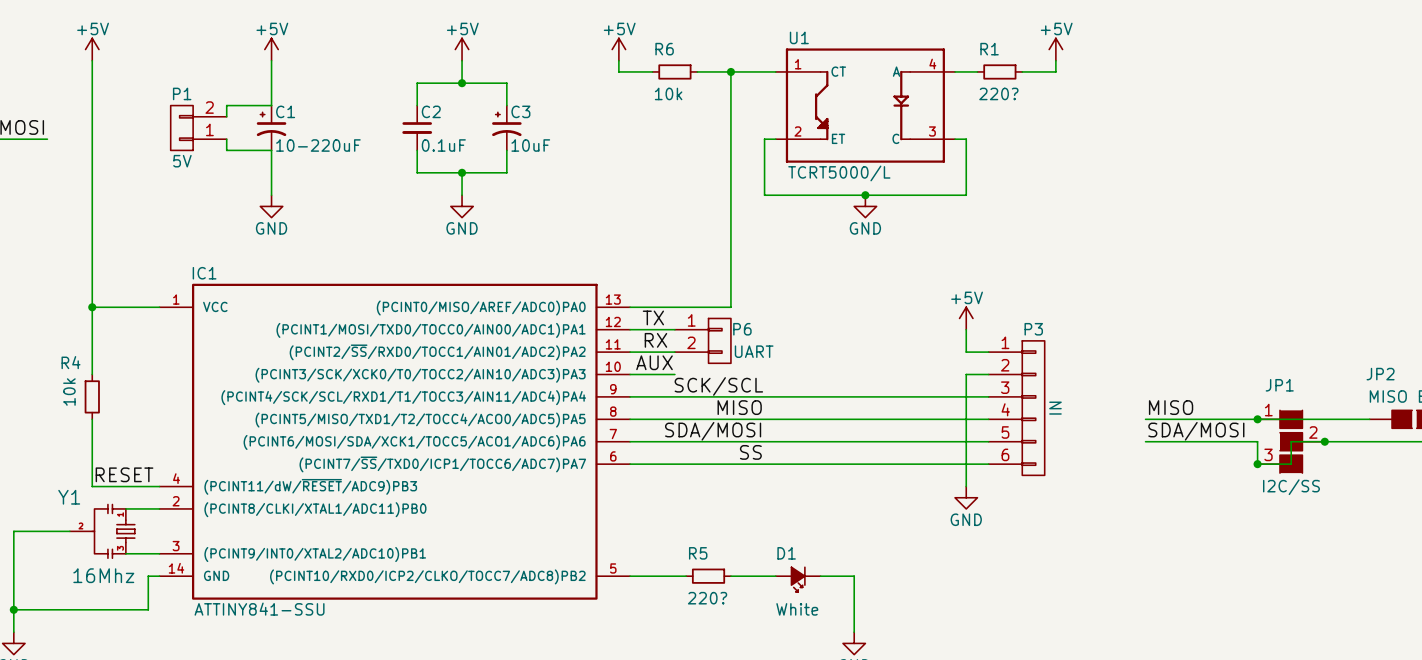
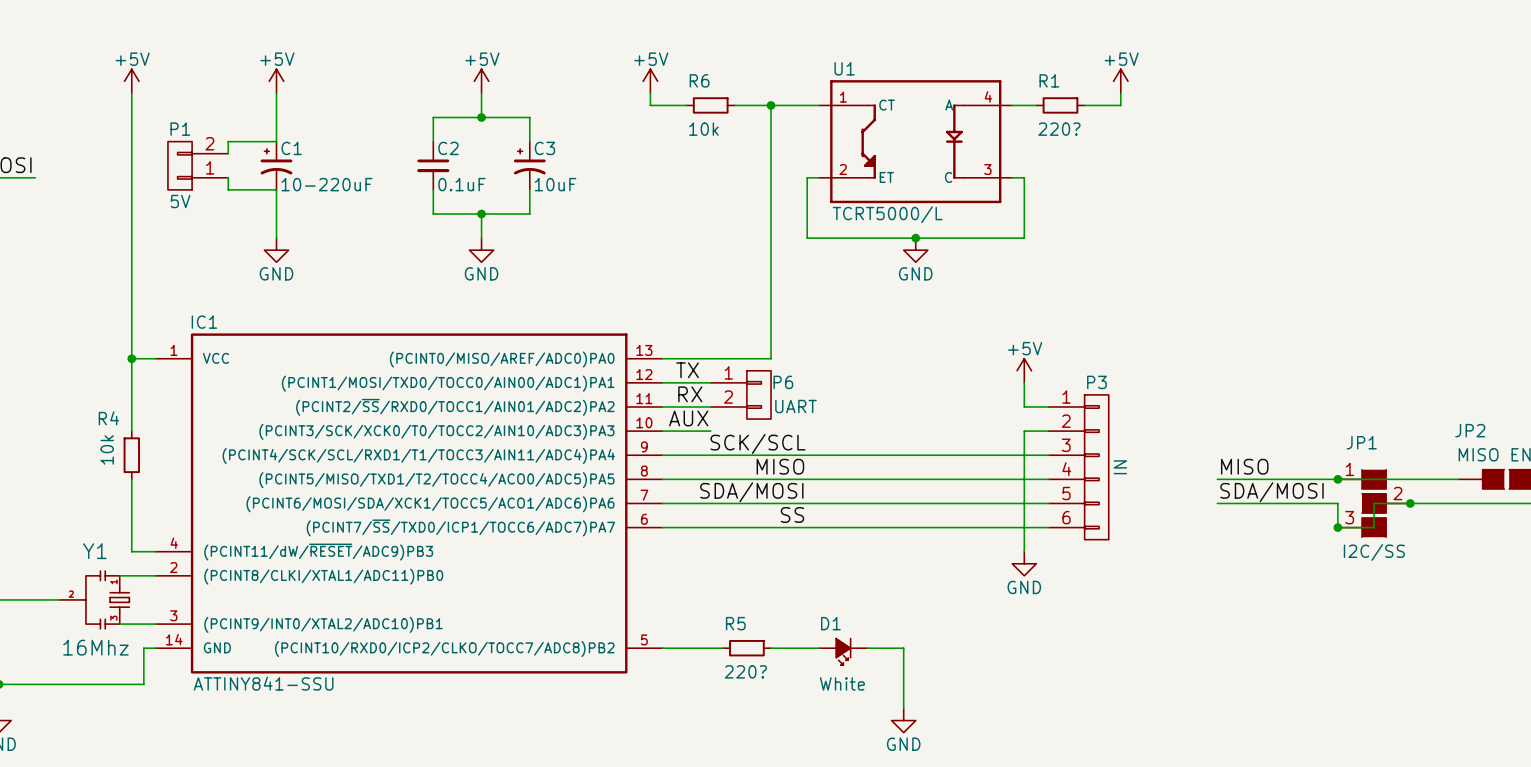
power symbol position: +5V (92, 49) -> +5V (131, 81)
wire: (92, 60) (92, 374) -> (131, 93) (131, 431)
wire: (92, 307) (137, 307) -> none
junction position: (92, 307) -> (131, 358)
R4 position: (92, 396) -> (131, 455)
wire: (92, 419) (92, 486) (137, 486) -> (131, 479) (131, 551)
label: RESET (124, 474) -> none
Y1 name position: Y1 (69, 497) -> Y1 (94, 551)

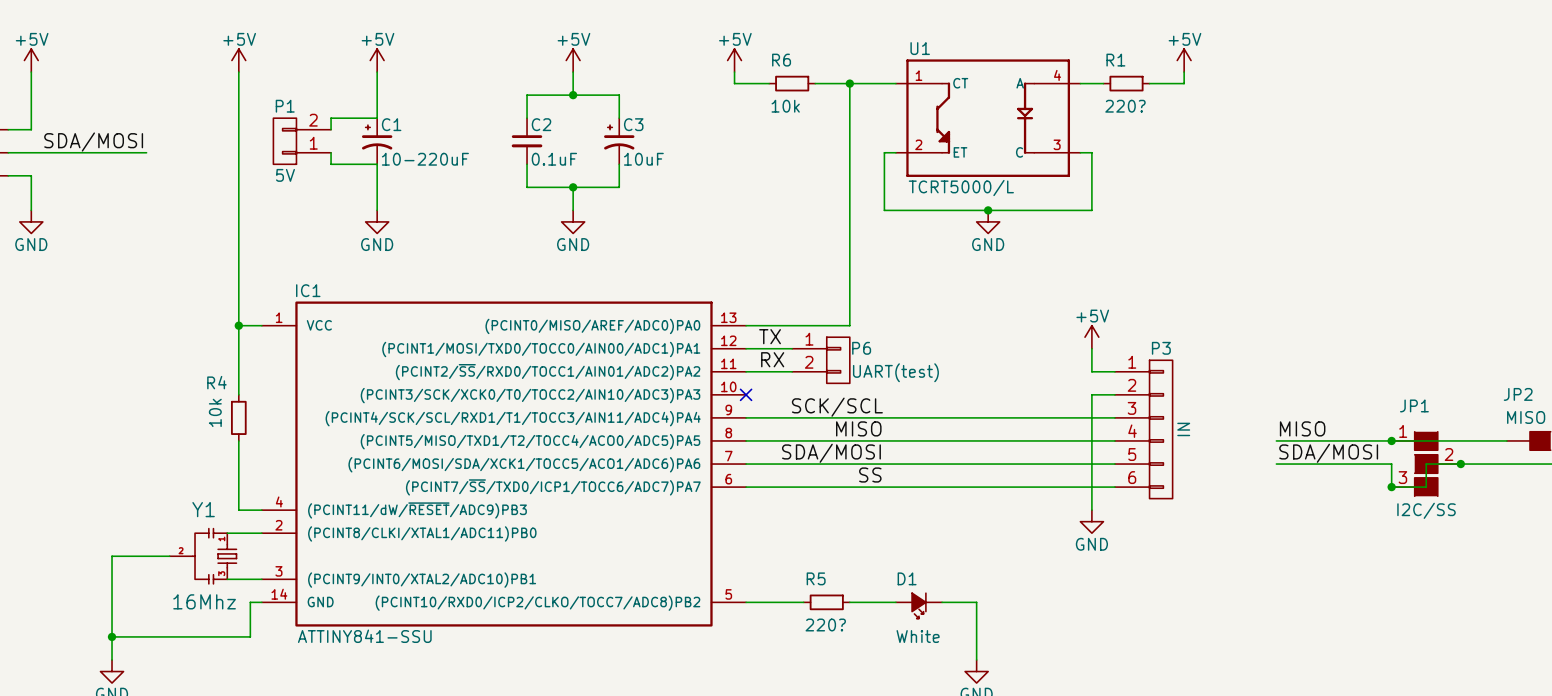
P6 value: UART (796, 406) -> UART(test) (895, 372)
label: AUX (688, 418) -> none
wire: (662, 431) (710, 431) -> none
no-connect mark: none -> (746, 394)

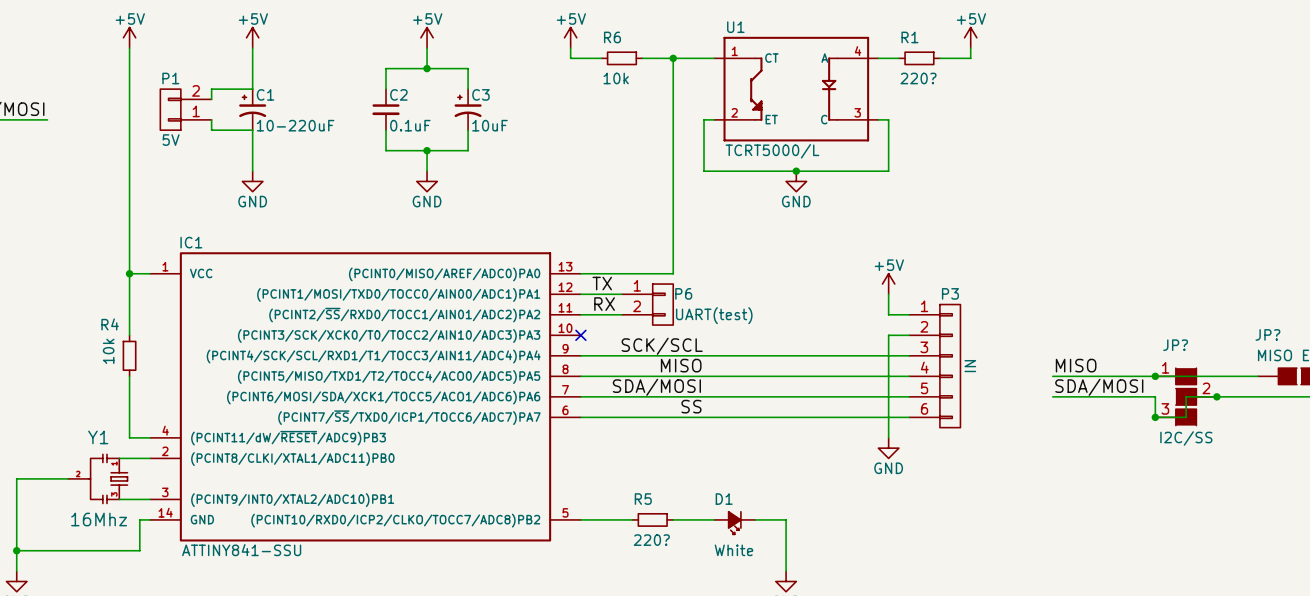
JP2 name: JP2 (1518, 394) -> JP? (1267, 334)
JP1 name: JP1 (1414, 405) -> JP? (1175, 345)

